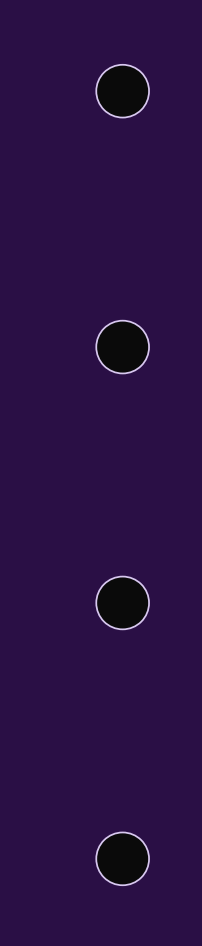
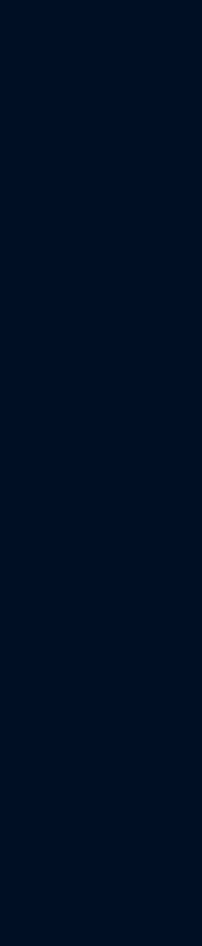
part: (122, 91) -> none
part: (122, 347) -> none
part: (122, 602) -> none
part: (122, 858) -> none

